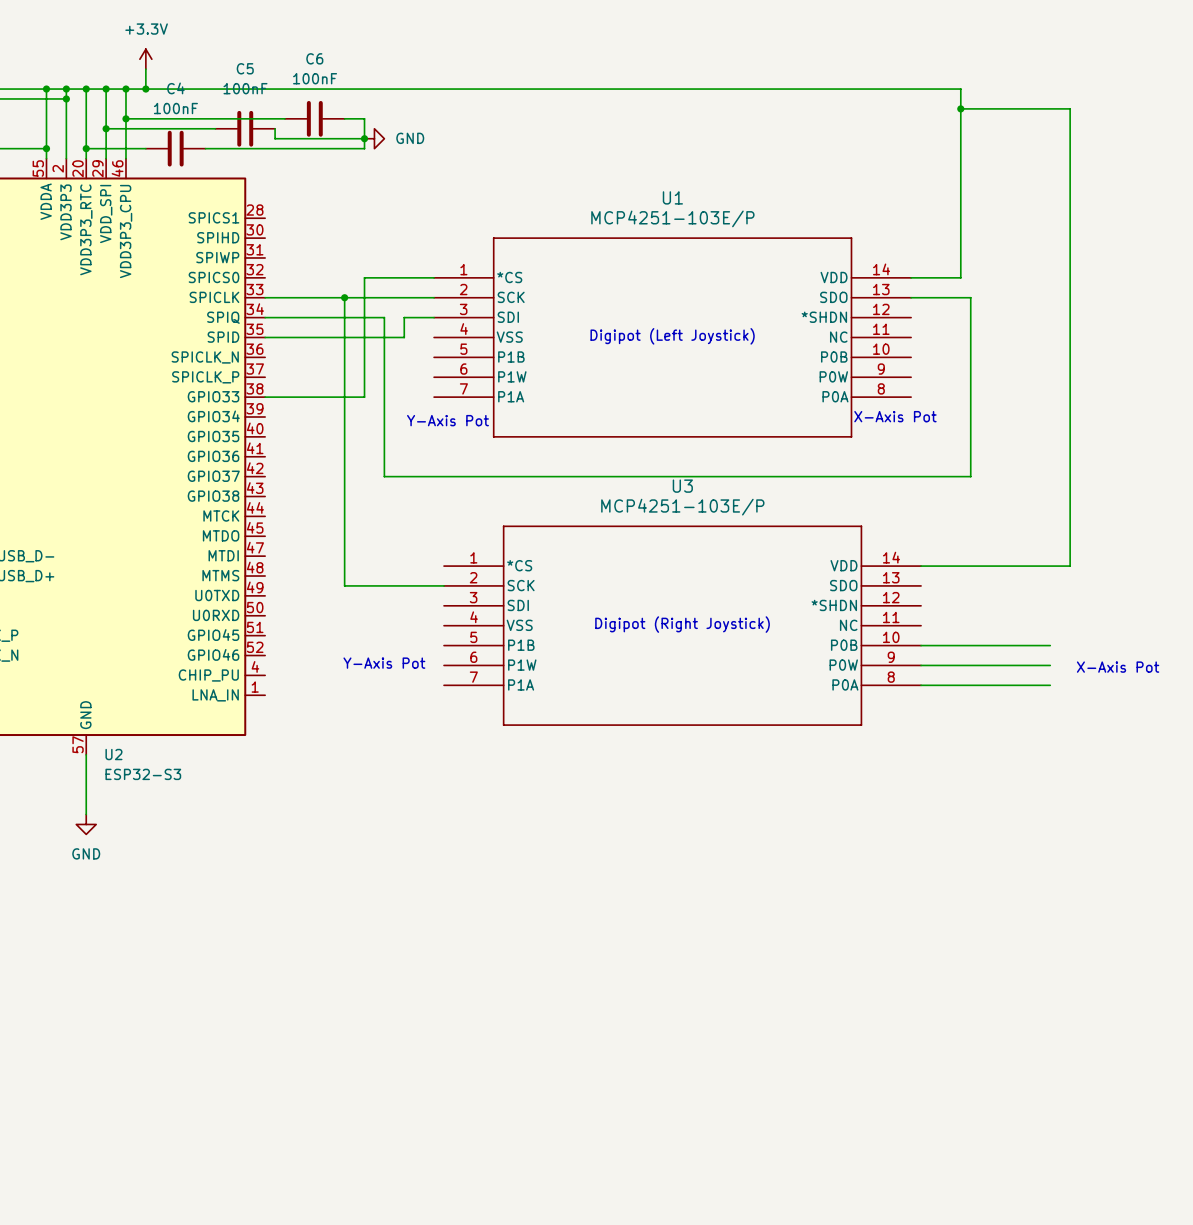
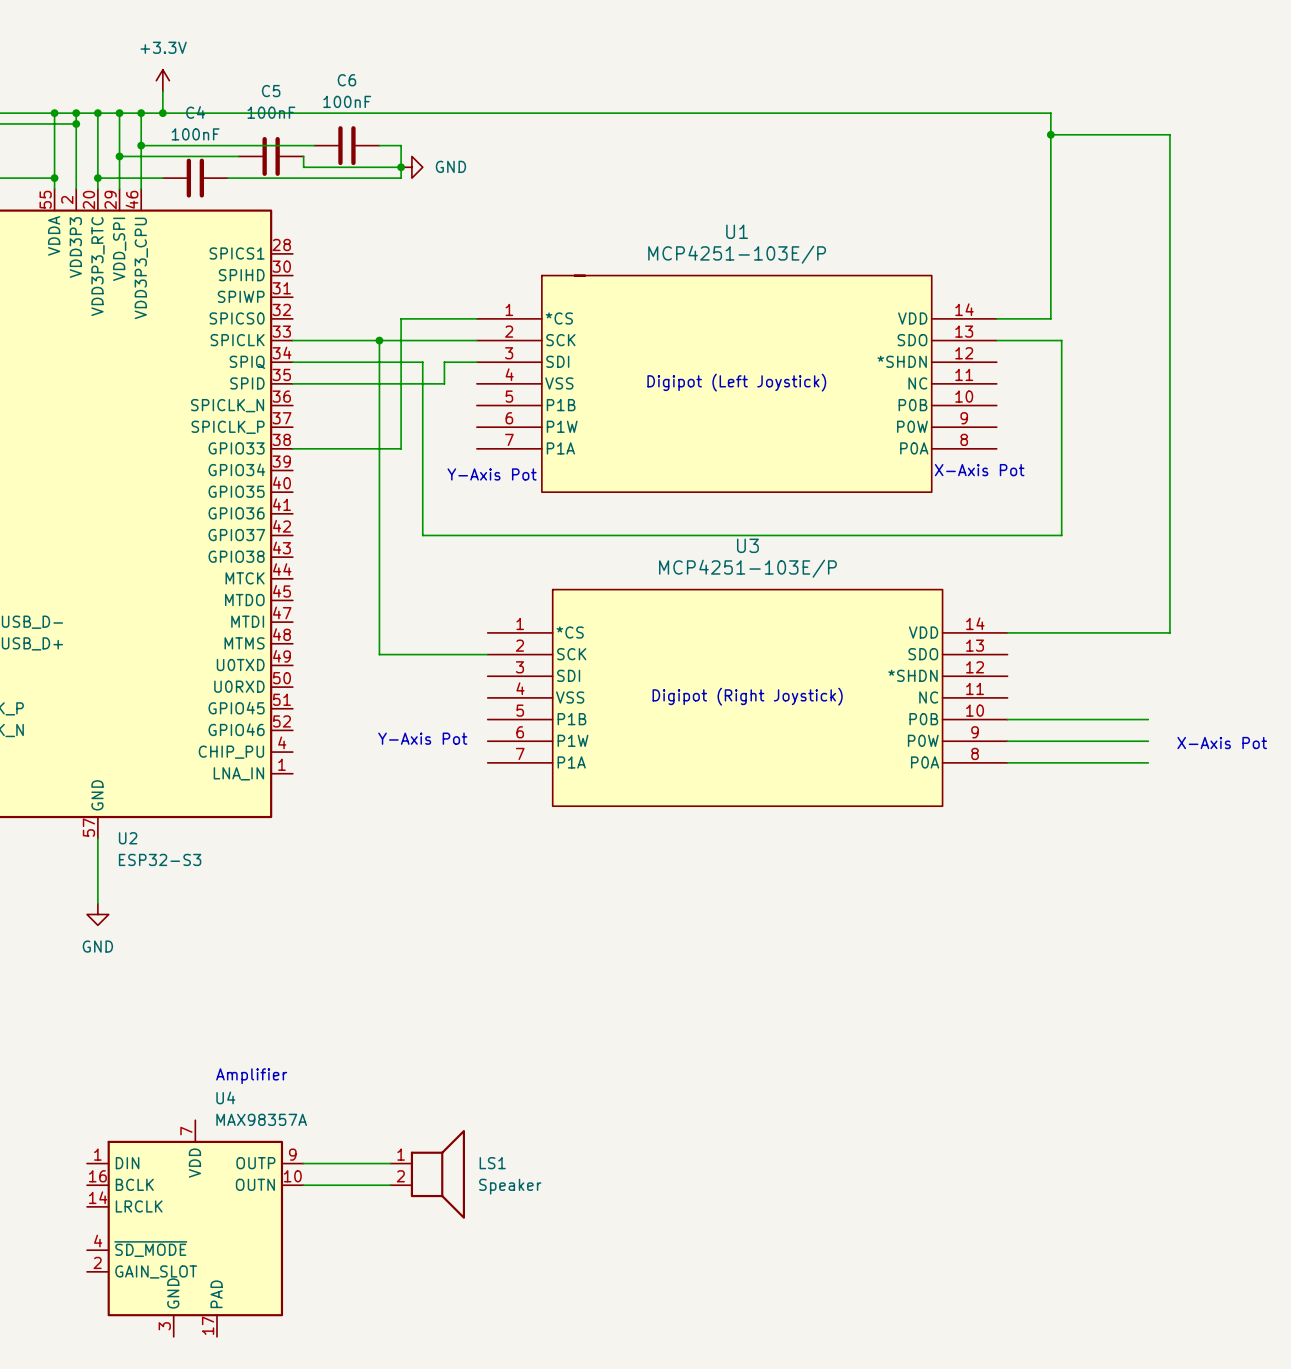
U1 symbol: [434, 237, 912, 438] -> [476, 275, 997, 493]
U3 symbol: [444, 525, 922, 726] -> [487, 589, 1008, 807]
text: none -> Amplifier (251, 1076)
wire: none -> (303, 1163) (390, 1163)
LS1: none -> Speaker (427, 1174)
wire: none -> (303, 1185) (390, 1185)
U4: none -> MAX98357A (195, 1228)

